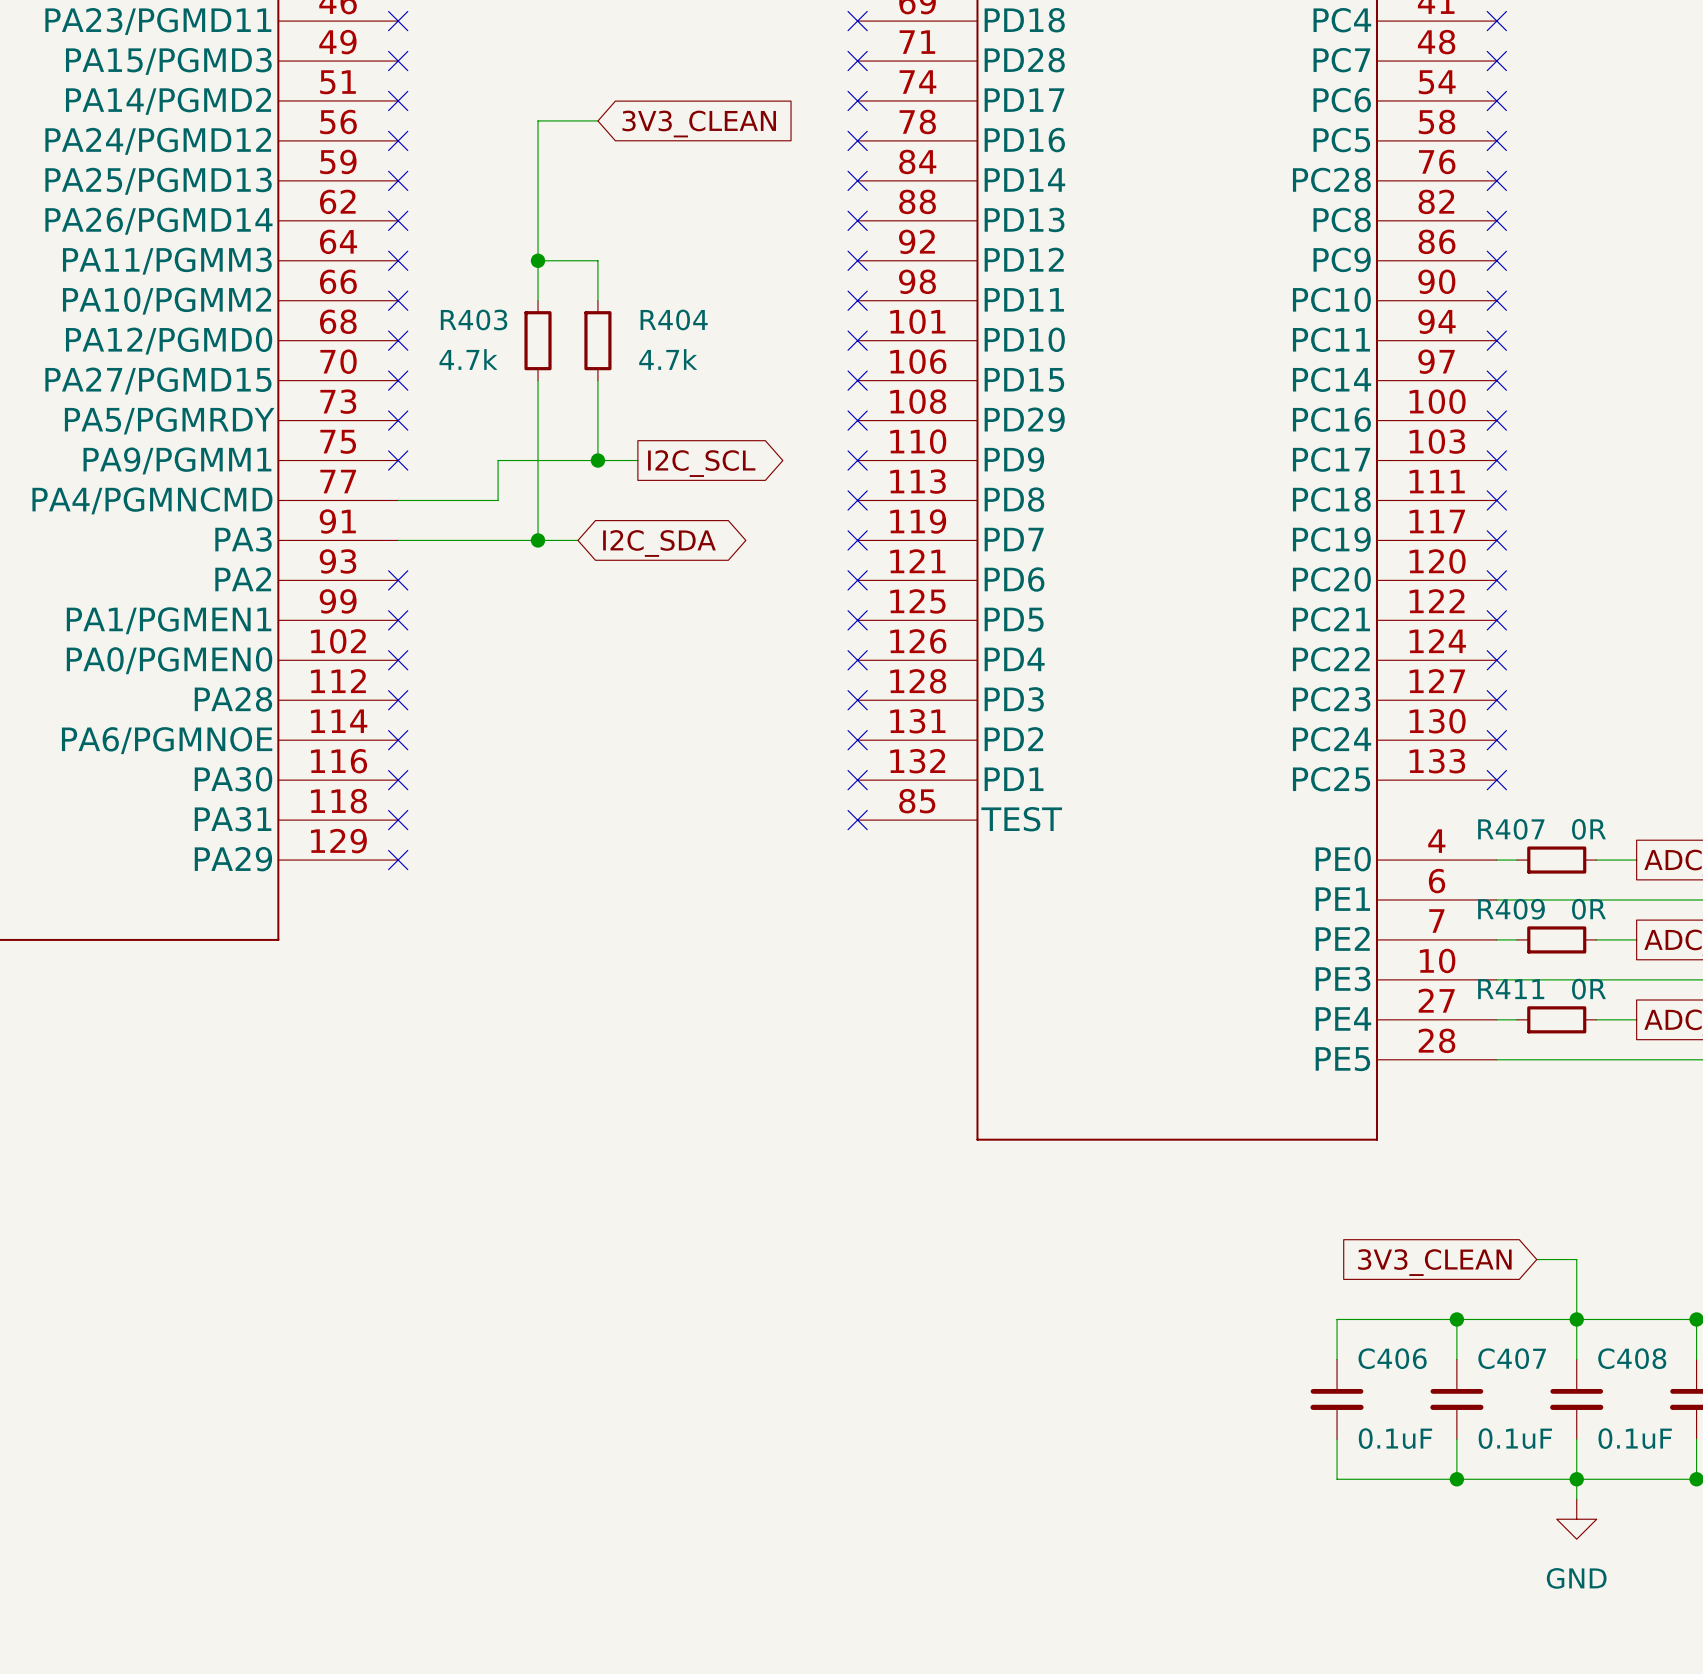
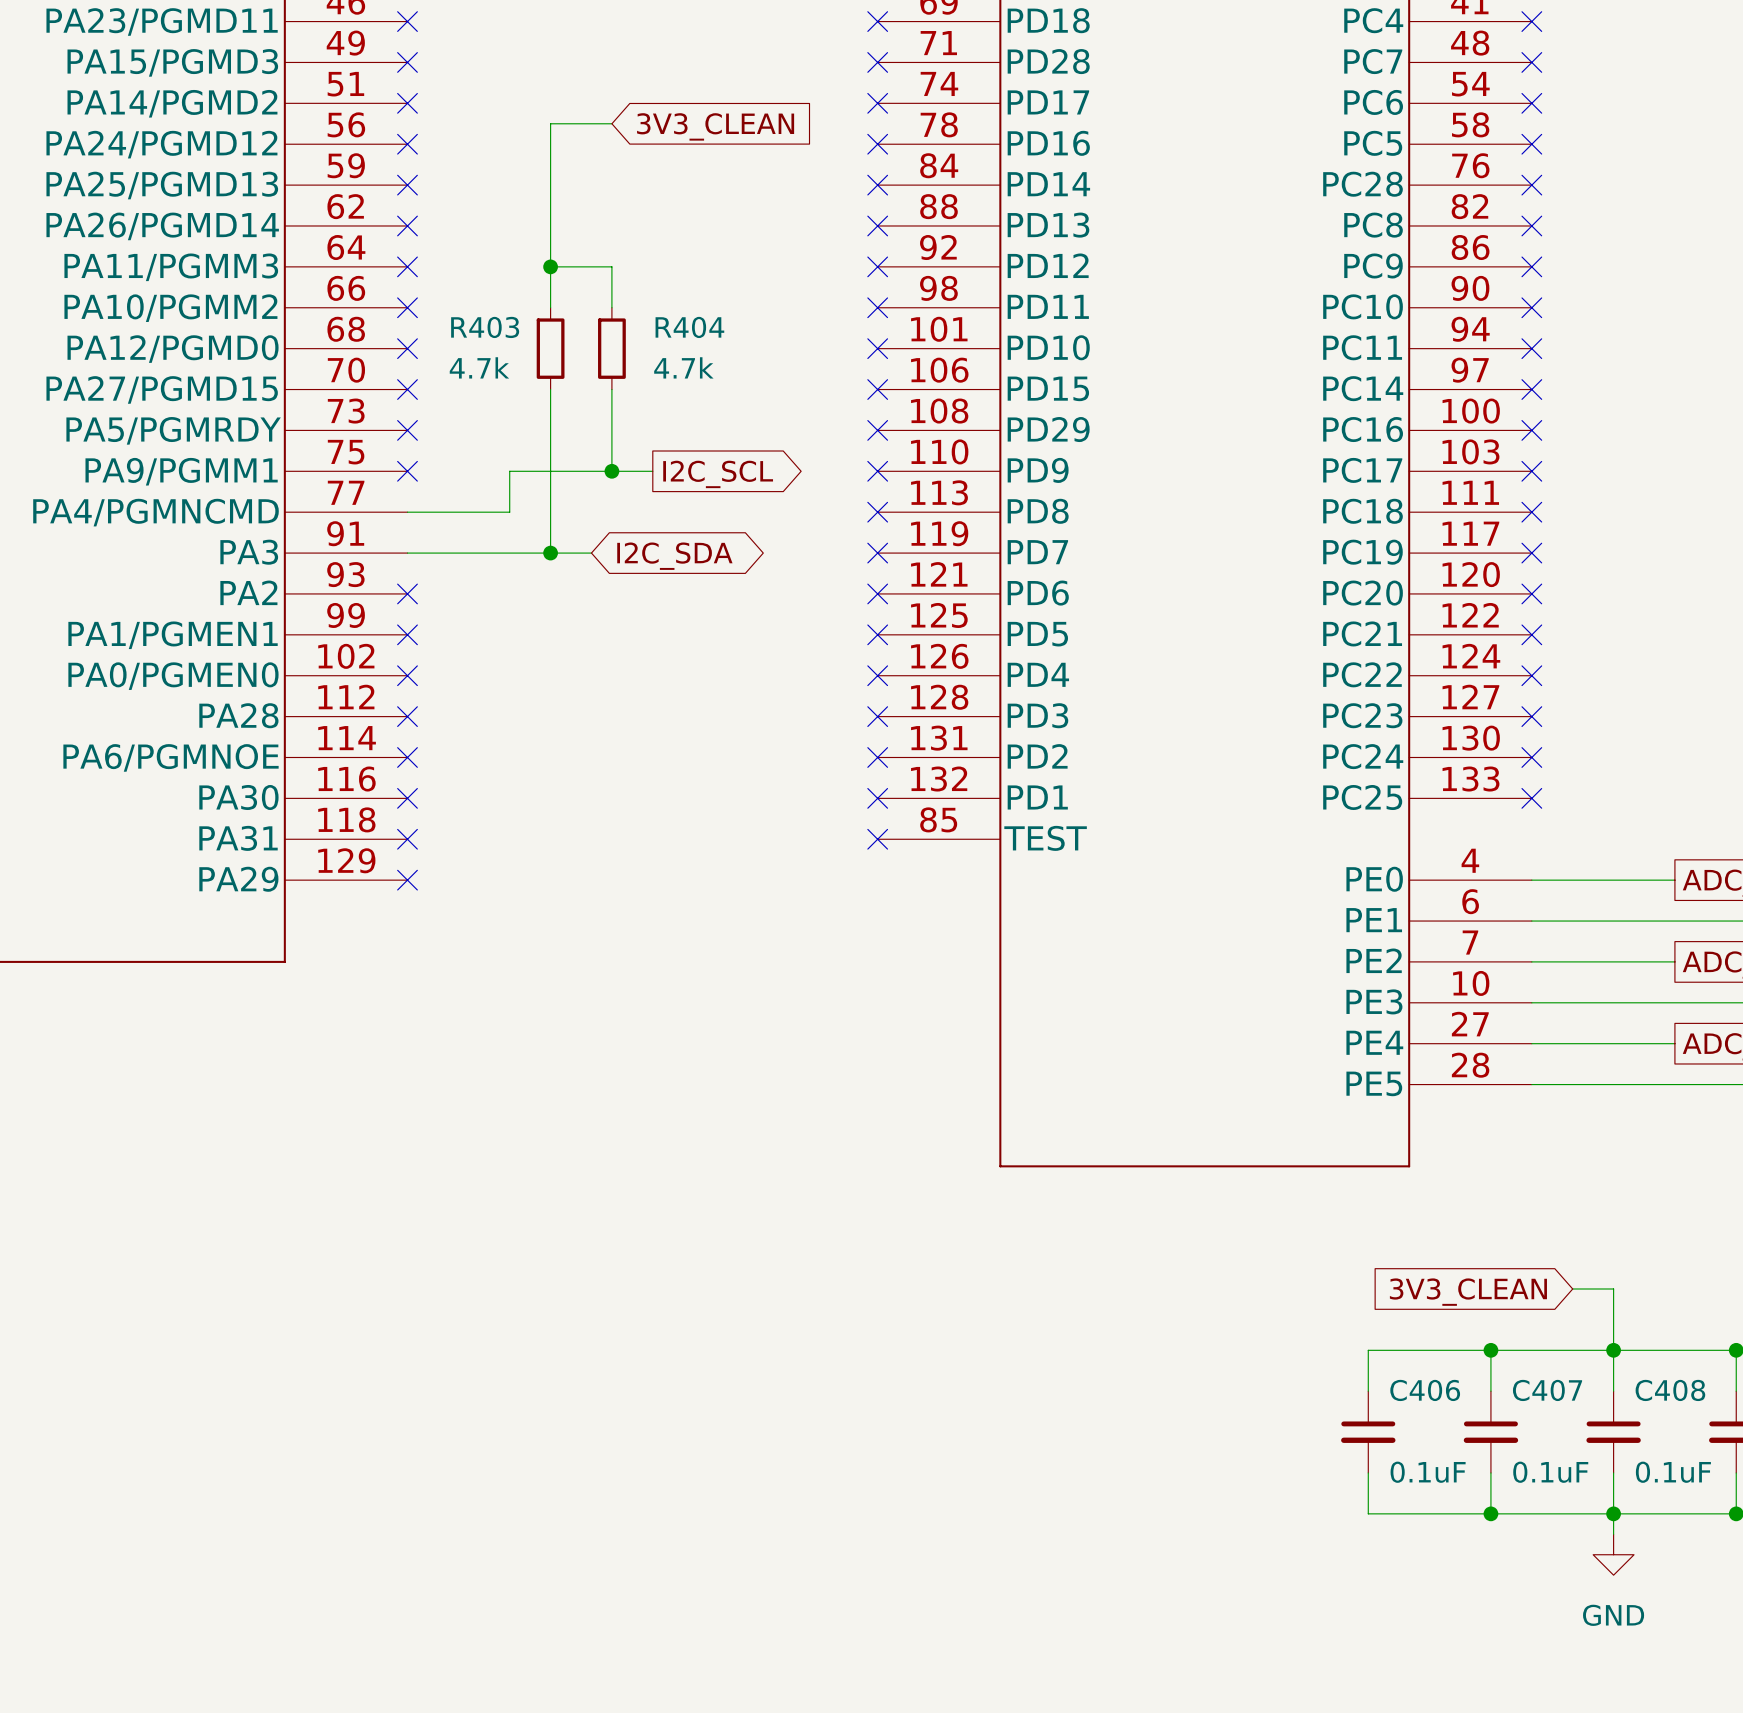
wire: none -> (1552, 880) (1634, 880)
R407: 0R (1556, 860) -> none
wire: none -> (1552, 961) (1634, 961)
R409: 0R (1556, 939) -> none
wire: none -> (1552, 1043) (1634, 1043)
R411: 0R (1556, 1019) -> none

